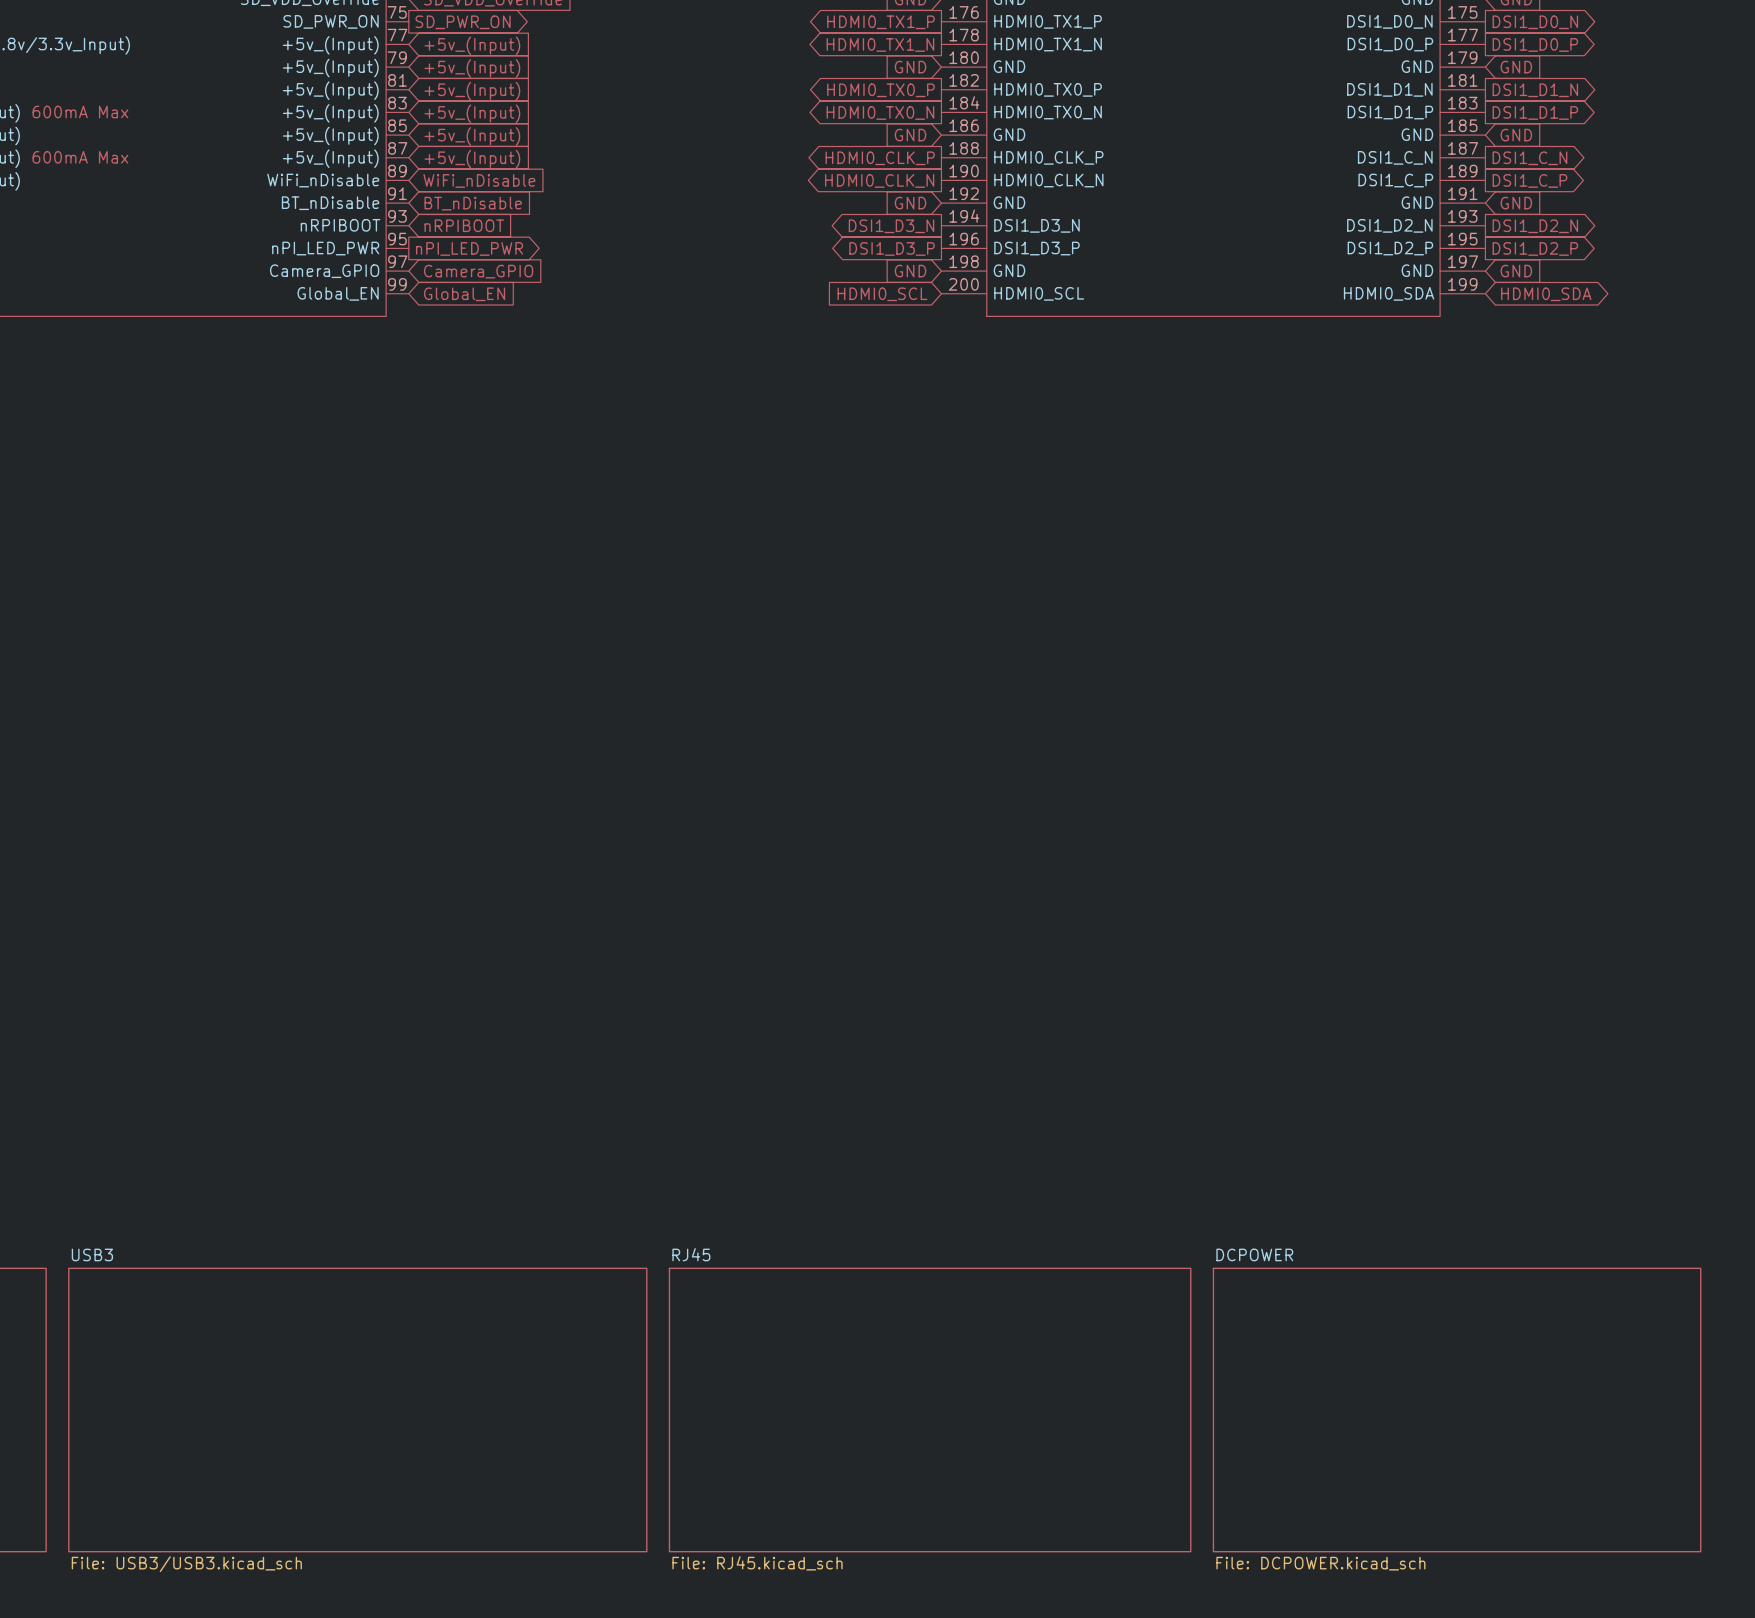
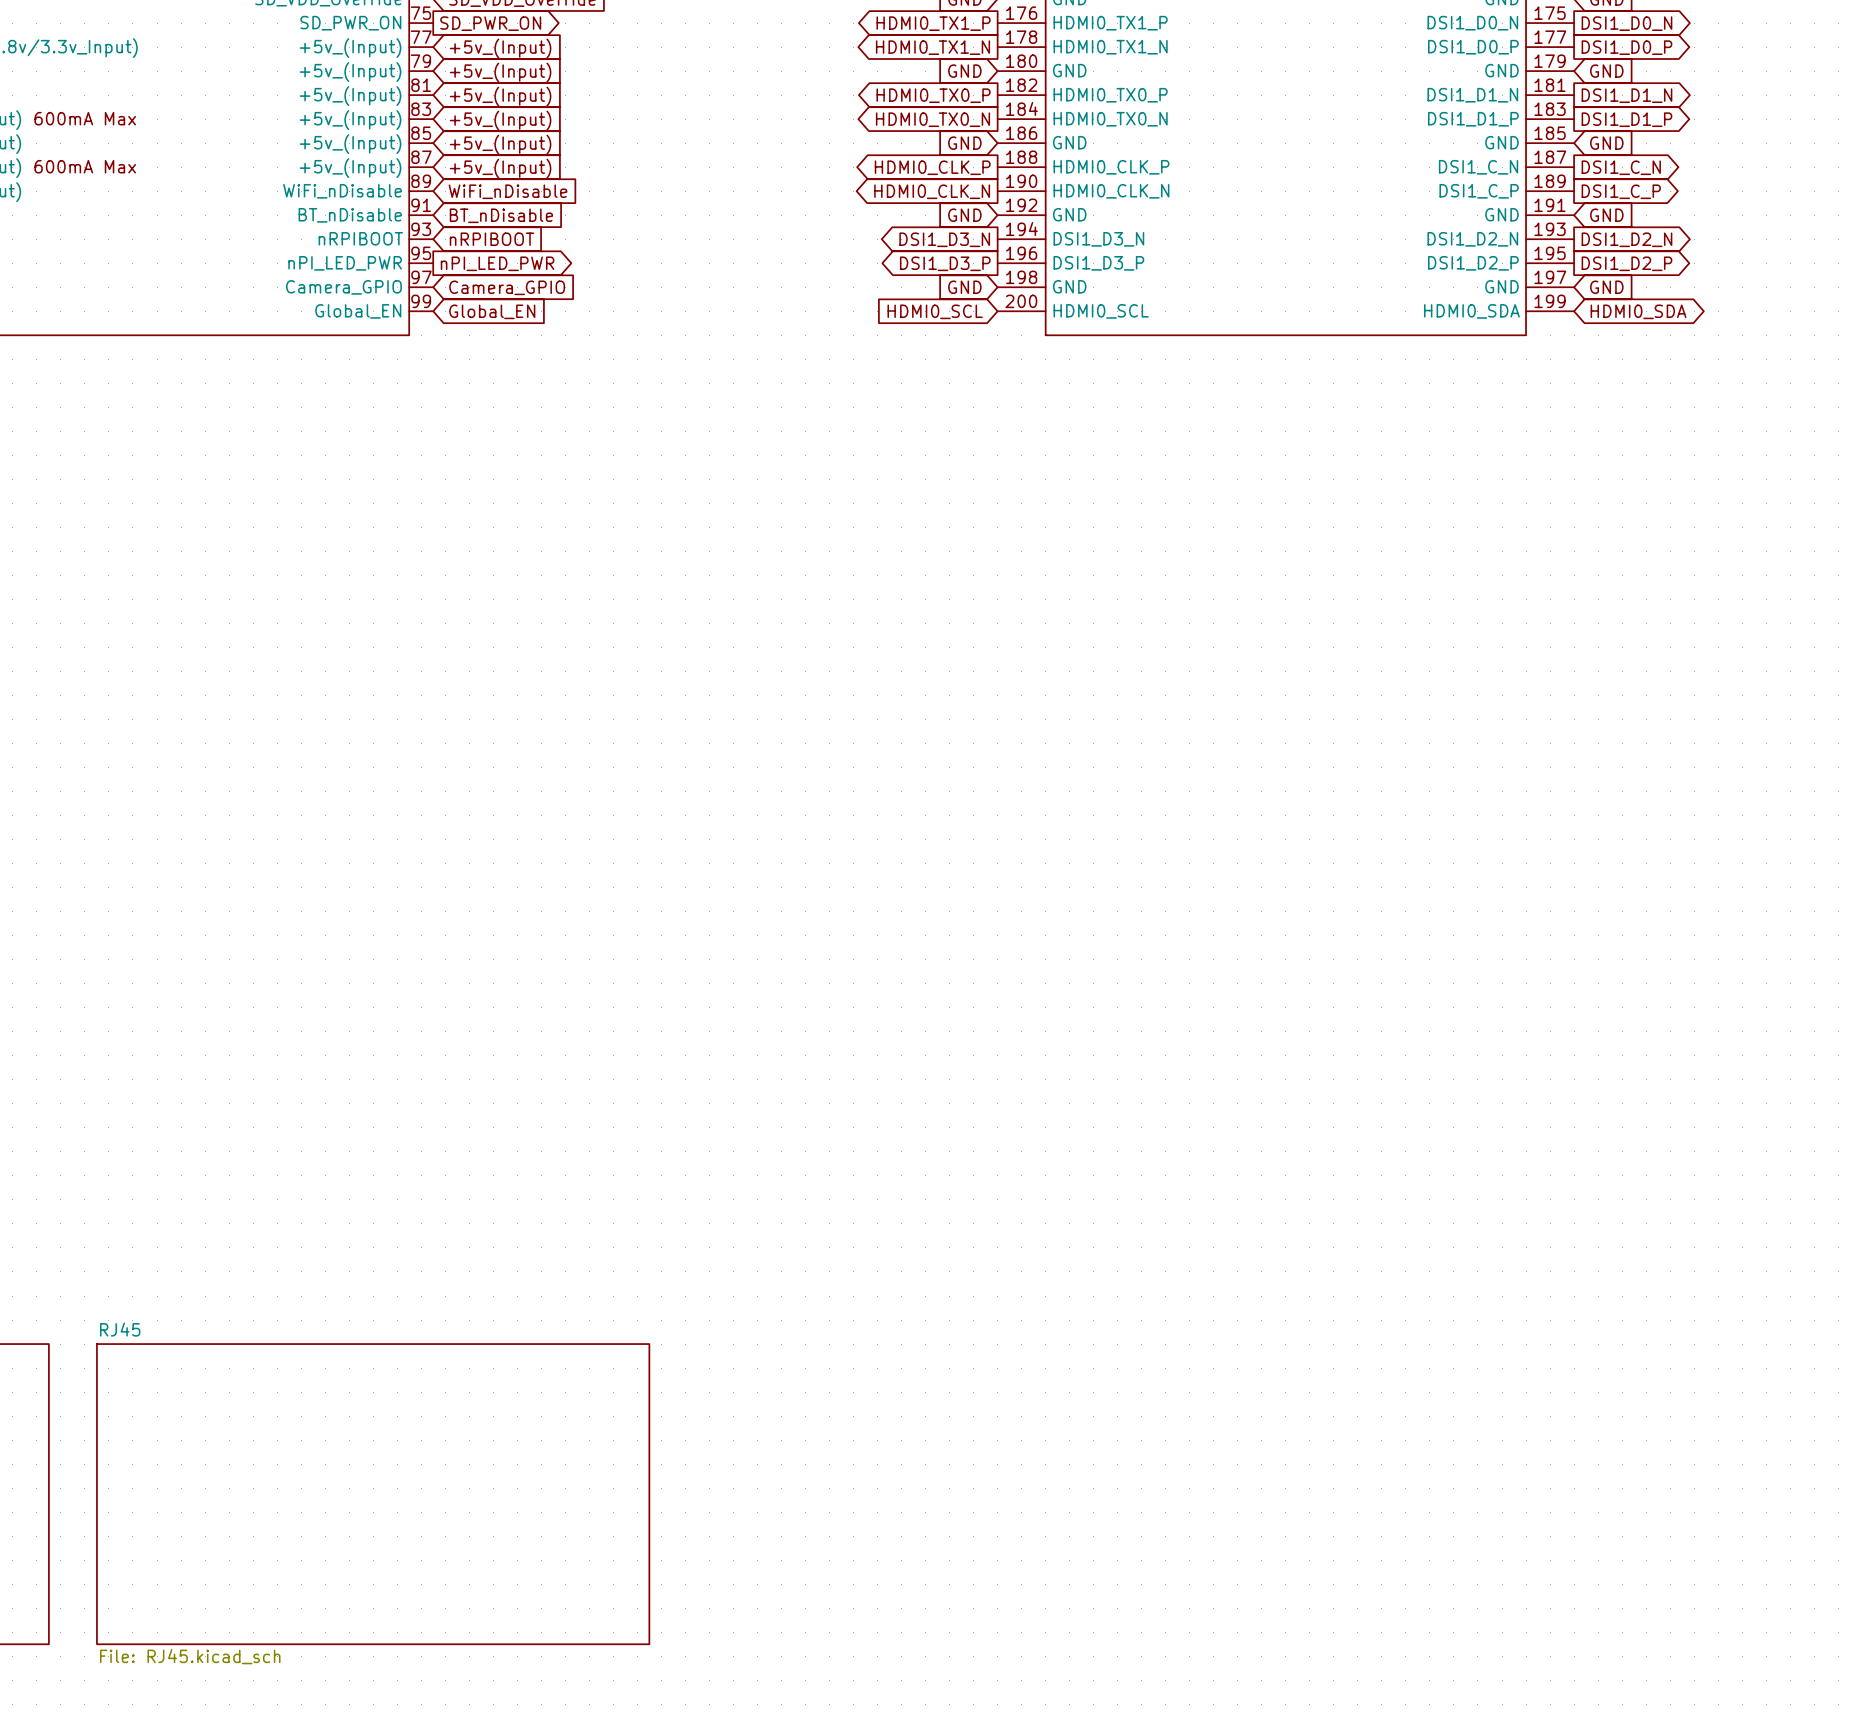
sheet USB3: File: USB3/USB3.kicad_sch (357, 1410) -> none
sheet RJ45 position: (930, 1410) -> (373, 1494)
sheet DCPOWER: File: DCPOWER.kicad_sch (1457, 1410) -> none

